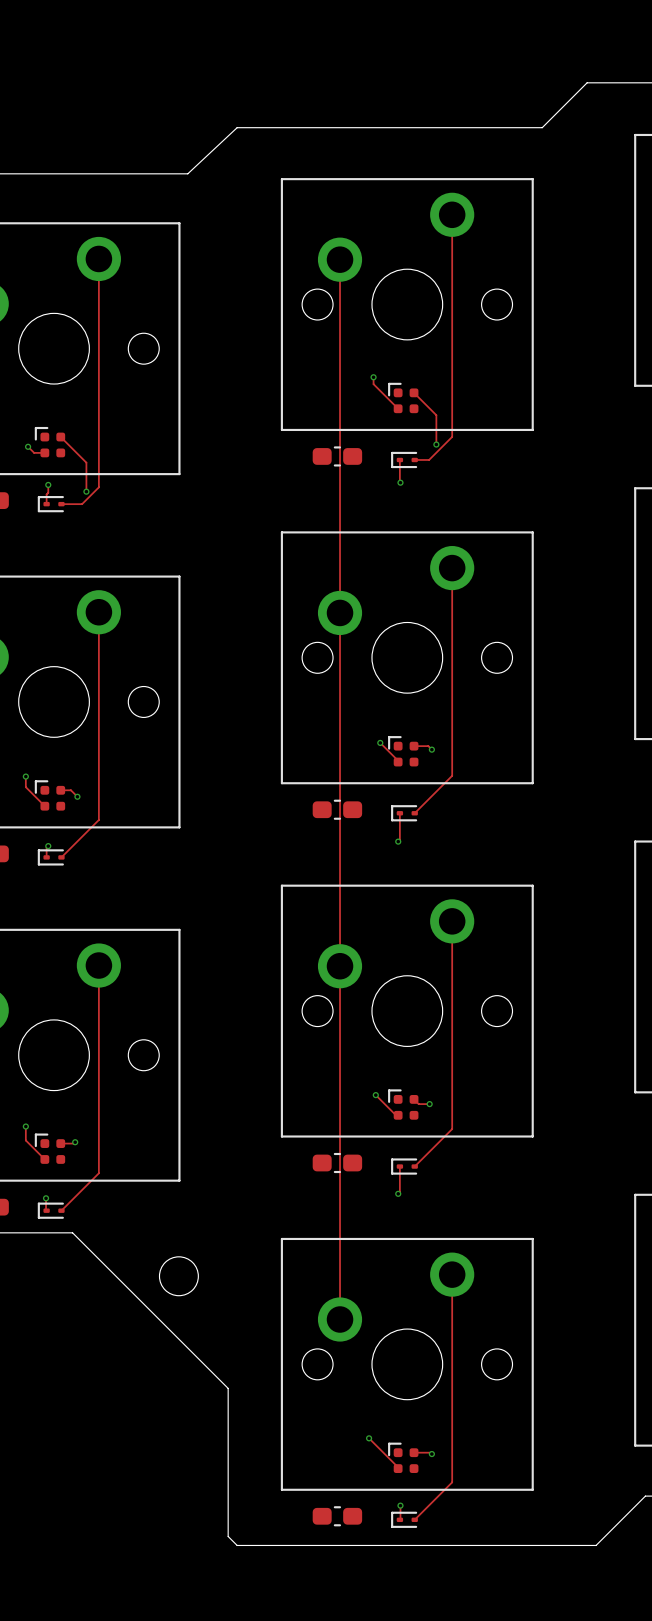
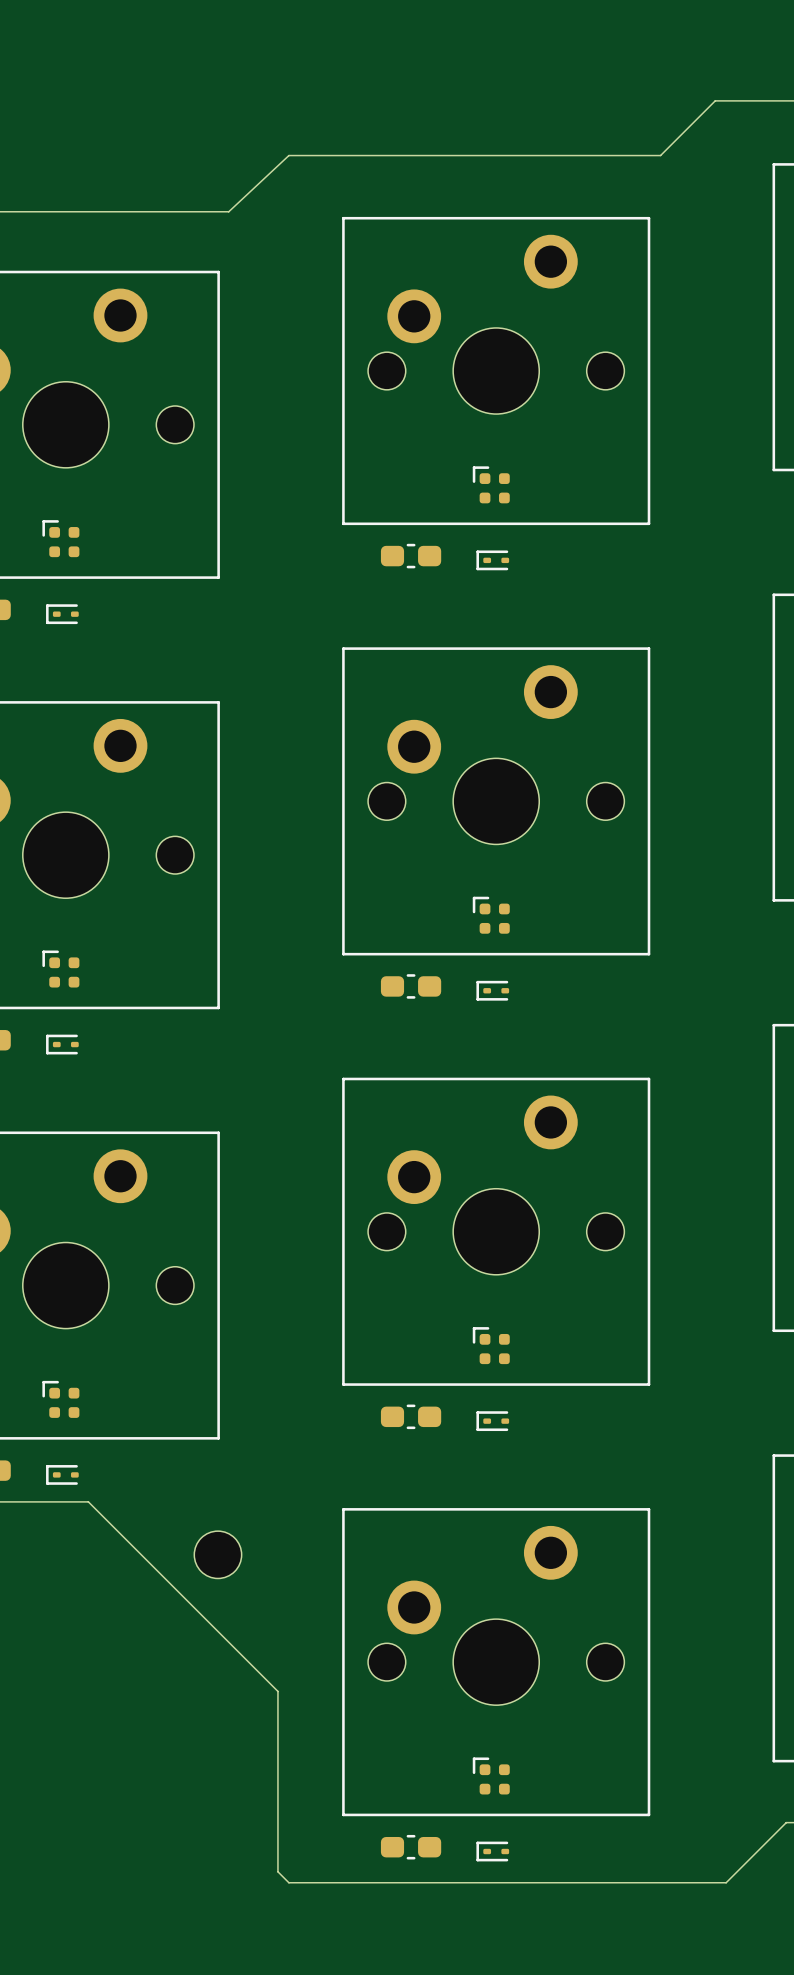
track: (452, 214) (452, 436) (429, 459) (414, 459) -> none
track: (98, 258) (98, 487) (82, 504) (61, 504) -> none
track: (340, 259) (340, 1319) -> none
track: (373, 377) (373, 384) (398, 408) -> none
via: (373, 377) -> none
track: (414, 392) (436, 415) (436, 444) -> none
track: (60, 437) (86, 462) (86, 491) -> none
via: (436, 444) -> none
track: (28, 446) (34, 452) (44, 452) -> none
via: (28, 446) -> none
track: (399, 459) (400, 482) -> none
via: (400, 482) -> none
track: (48, 484) (46, 504) -> none
via: (48, 484) -> none
via: (86, 491) -> none
track: (452, 568) (452, 775) (414, 813) -> none
track: (98, 612) (98, 819) (61, 857) -> none
track: (380, 742) (398, 762) -> none
via: (380, 742) -> none
track: (414, 746) (428, 746) (431, 749) -> none
via: (431, 749) -> none
track: (25, 776) (25, 787) (44, 806) -> none
via: (25, 776) -> none
track: (60, 790) (70, 790) (77, 796) -> none
via: (77, 796) -> none
track: (399, 813) (399, 839) (398, 841) -> none
via: (398, 841) -> none
track: (48, 846) (46, 857) -> none
via: (48, 846) -> none
track: (452, 921) (452, 1129) (414, 1166) -> none
track: (98, 965) (98, 1173) (61, 1210) -> none
track: (375, 1095) (398, 1115) -> none
via: (375, 1095) -> none
track: (414, 1099) (418, 1104) (429, 1104) -> none
via: (429, 1104) -> none
track: (25, 1126) (25, 1140) (44, 1159) -> none
via: (25, 1126) -> none
track: (75, 1142) (60, 1143) -> none
via: (75, 1142) -> none
track: (399, 1166) (399, 1192) (398, 1193) -> none
via: (398, 1193) -> none
track: (46, 1198) (46, 1210) -> none
via: (46, 1198) -> none
track: (452, 1274) (452, 1482) (414, 1519) -> none
track: (369, 1438) (398, 1468) -> none
via: (369, 1438) -> none
track: (414, 1452) (431, 1454) -> none
via: (431, 1454) -> none
track: (400, 1505) (399, 1519) -> none
via: (400, 1505) -> none

